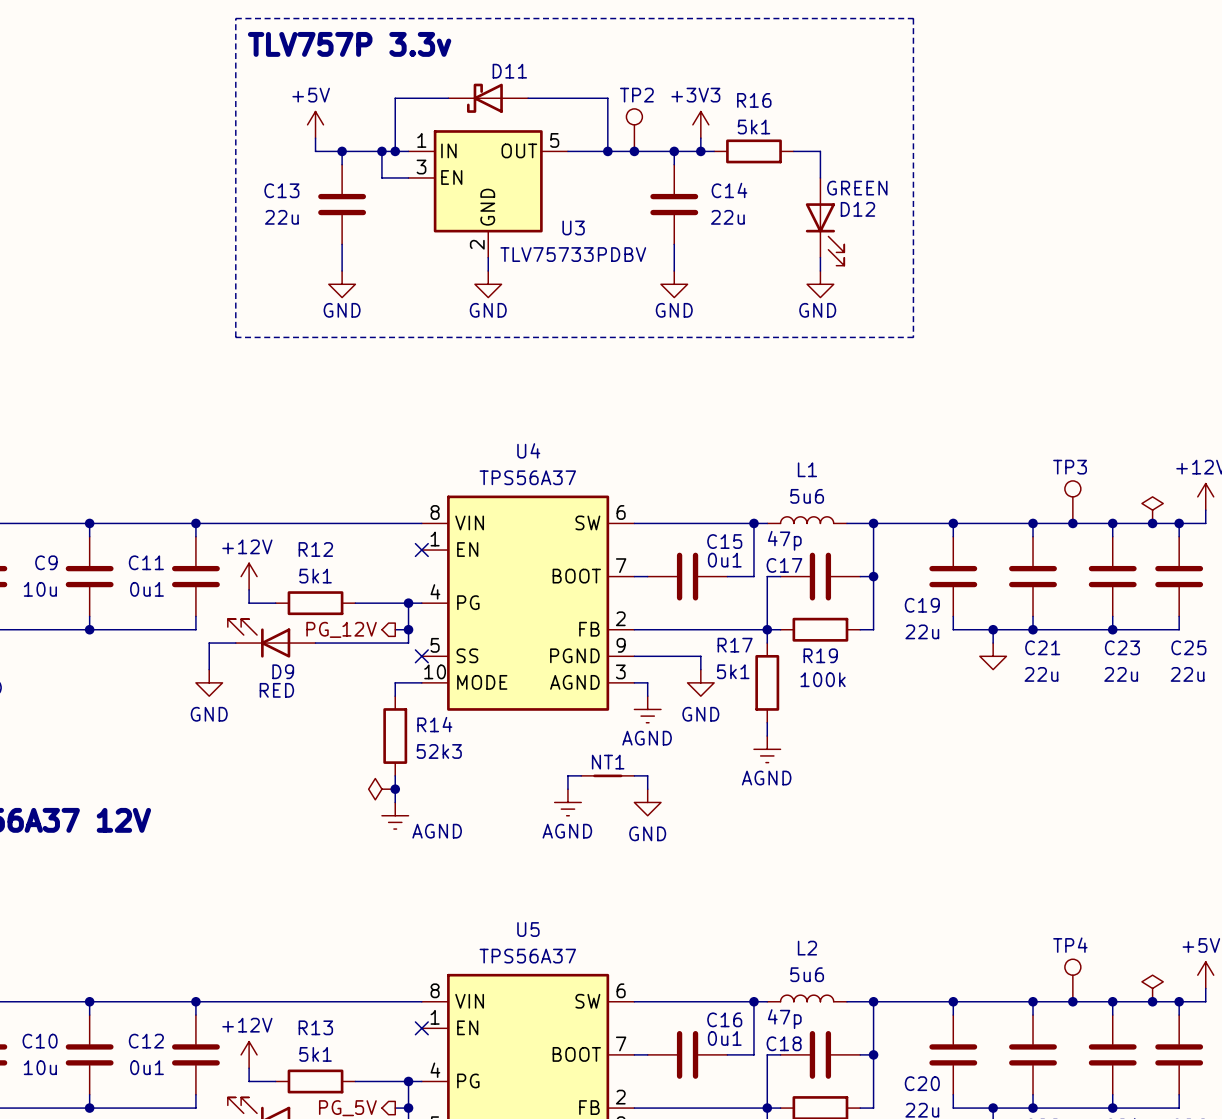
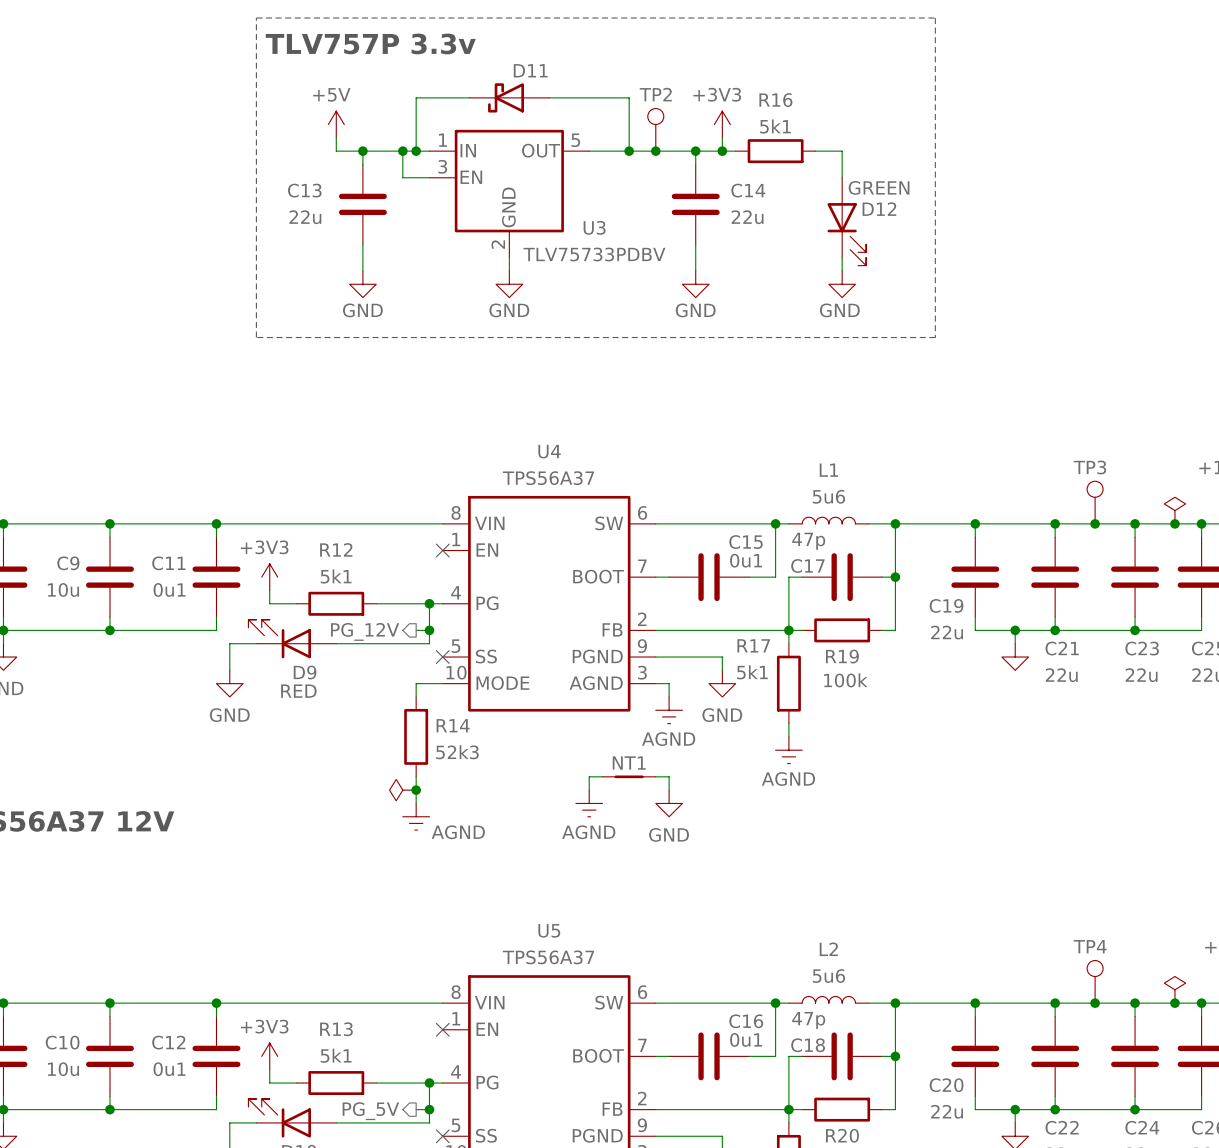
power symbol: +12V (249, 576) -> +3V3 (269, 577)
power symbol: +12V (249, 1054) -> +3V3 (269, 1056)

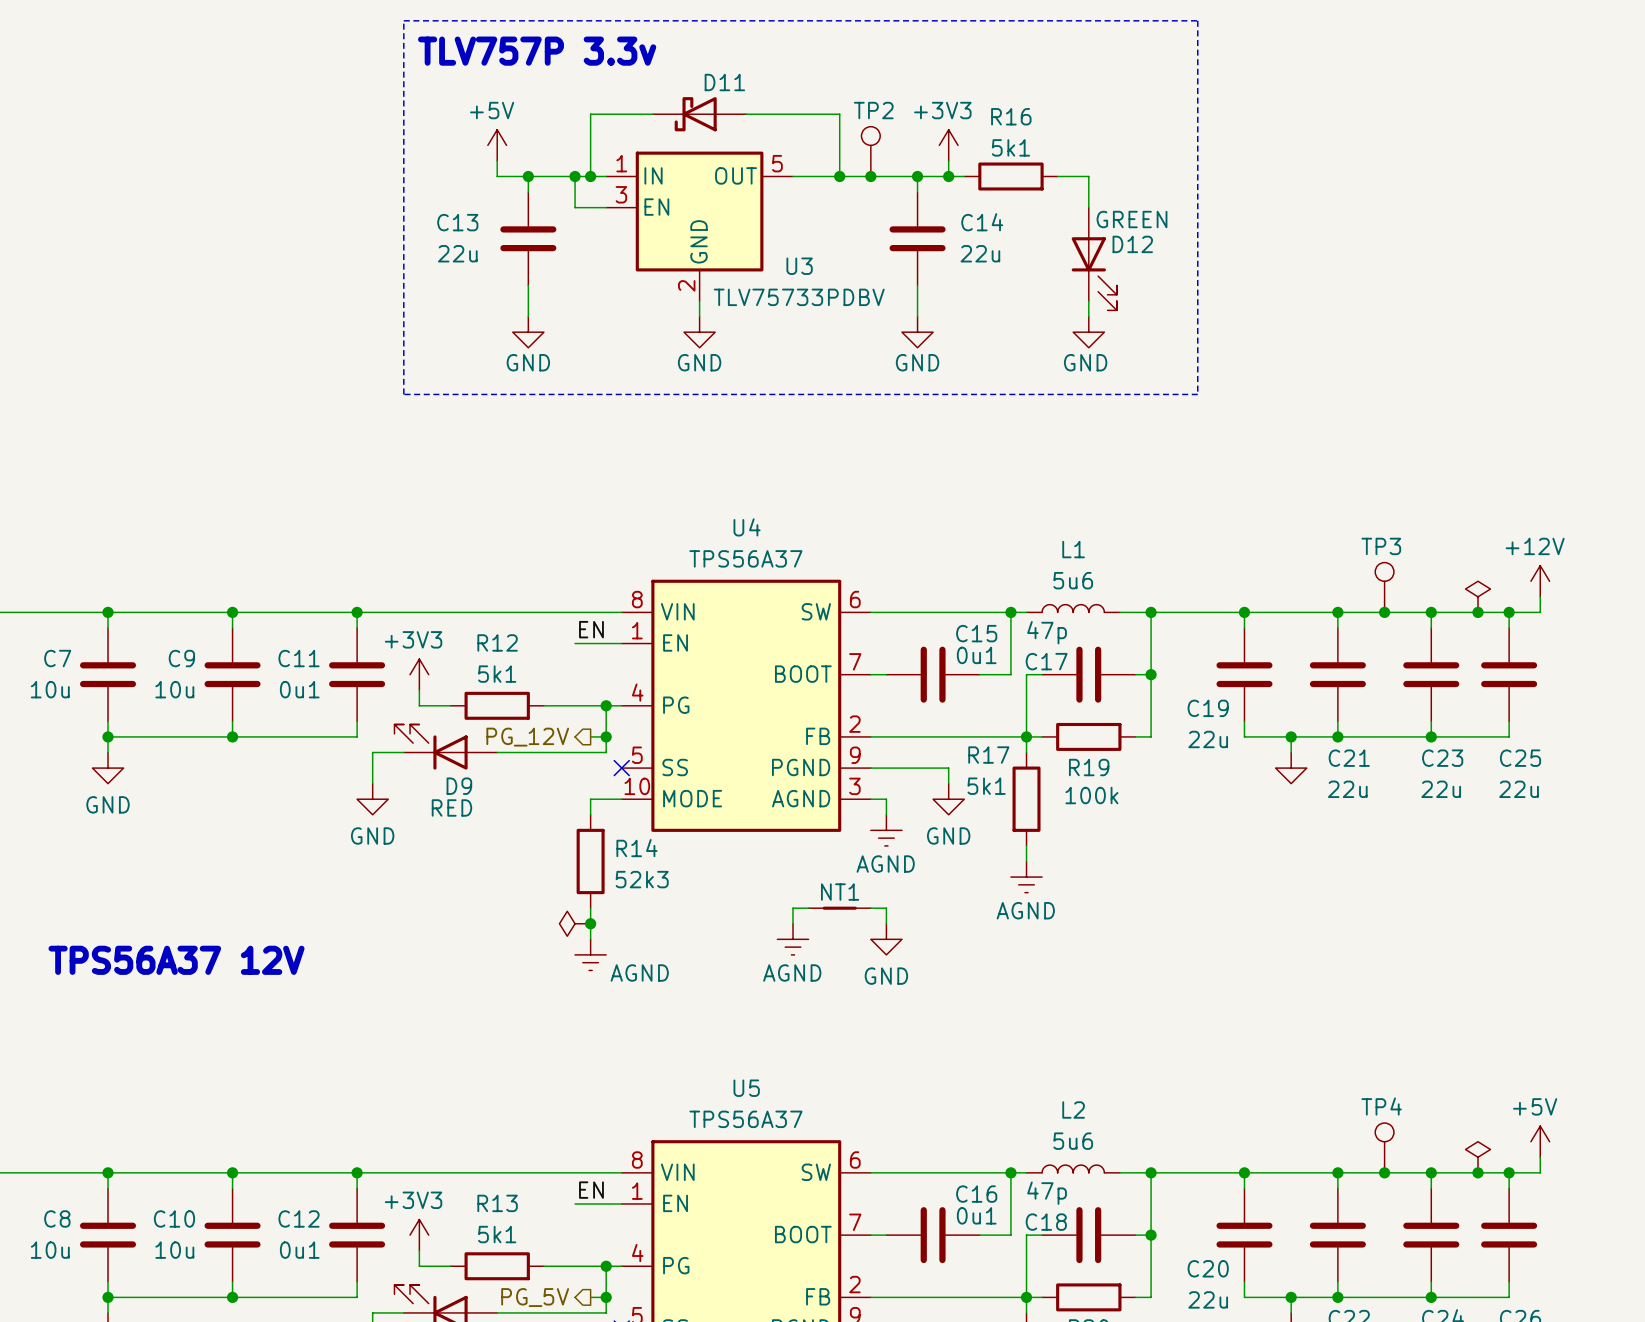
label: none -> EN (591, 629)
wire: none -> (575, 643) (621, 643)
no-connect mark: (442, 550) -> none
label: none -> EN (591, 1190)
wire: none -> (575, 1203) (621, 1203)
no-connect mark: (442, 1029) -> none

